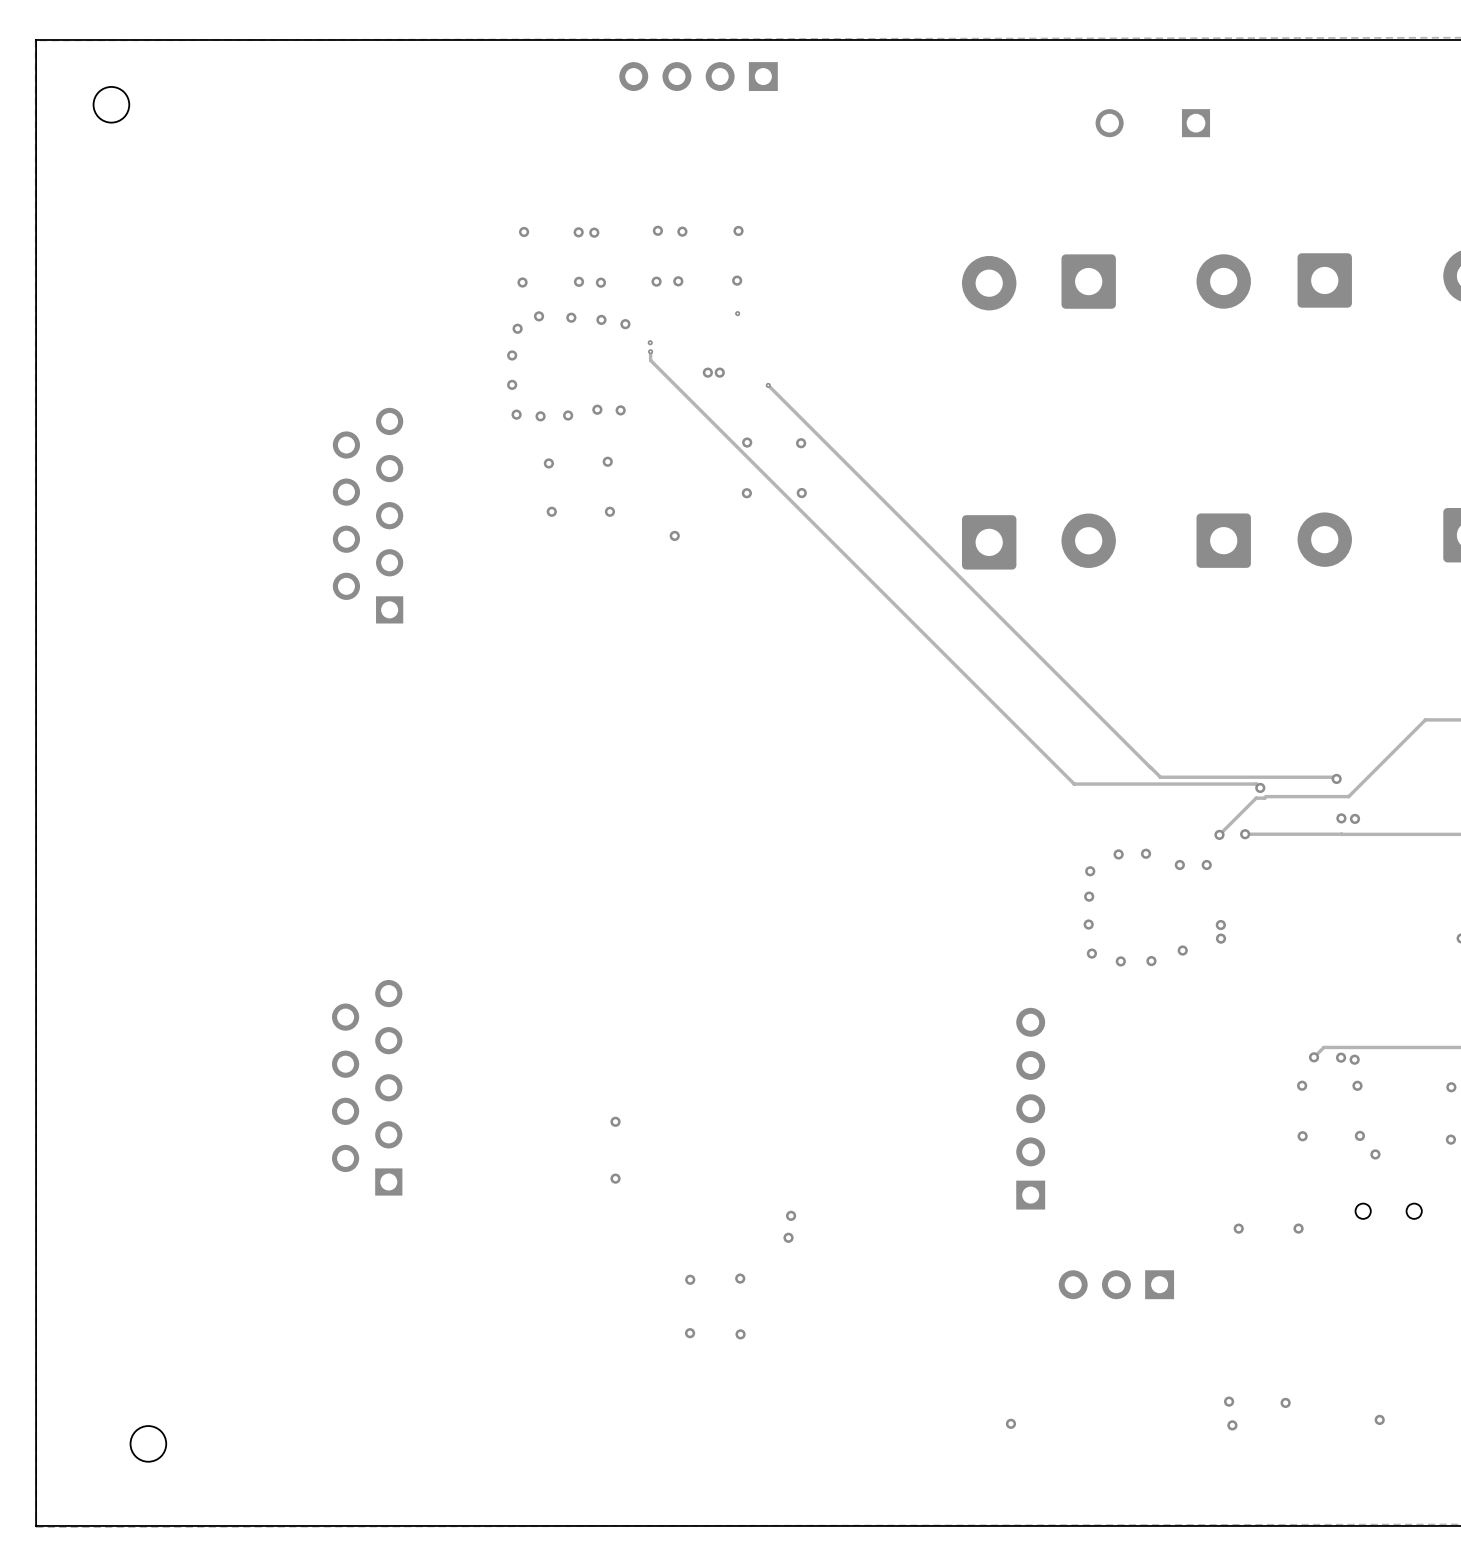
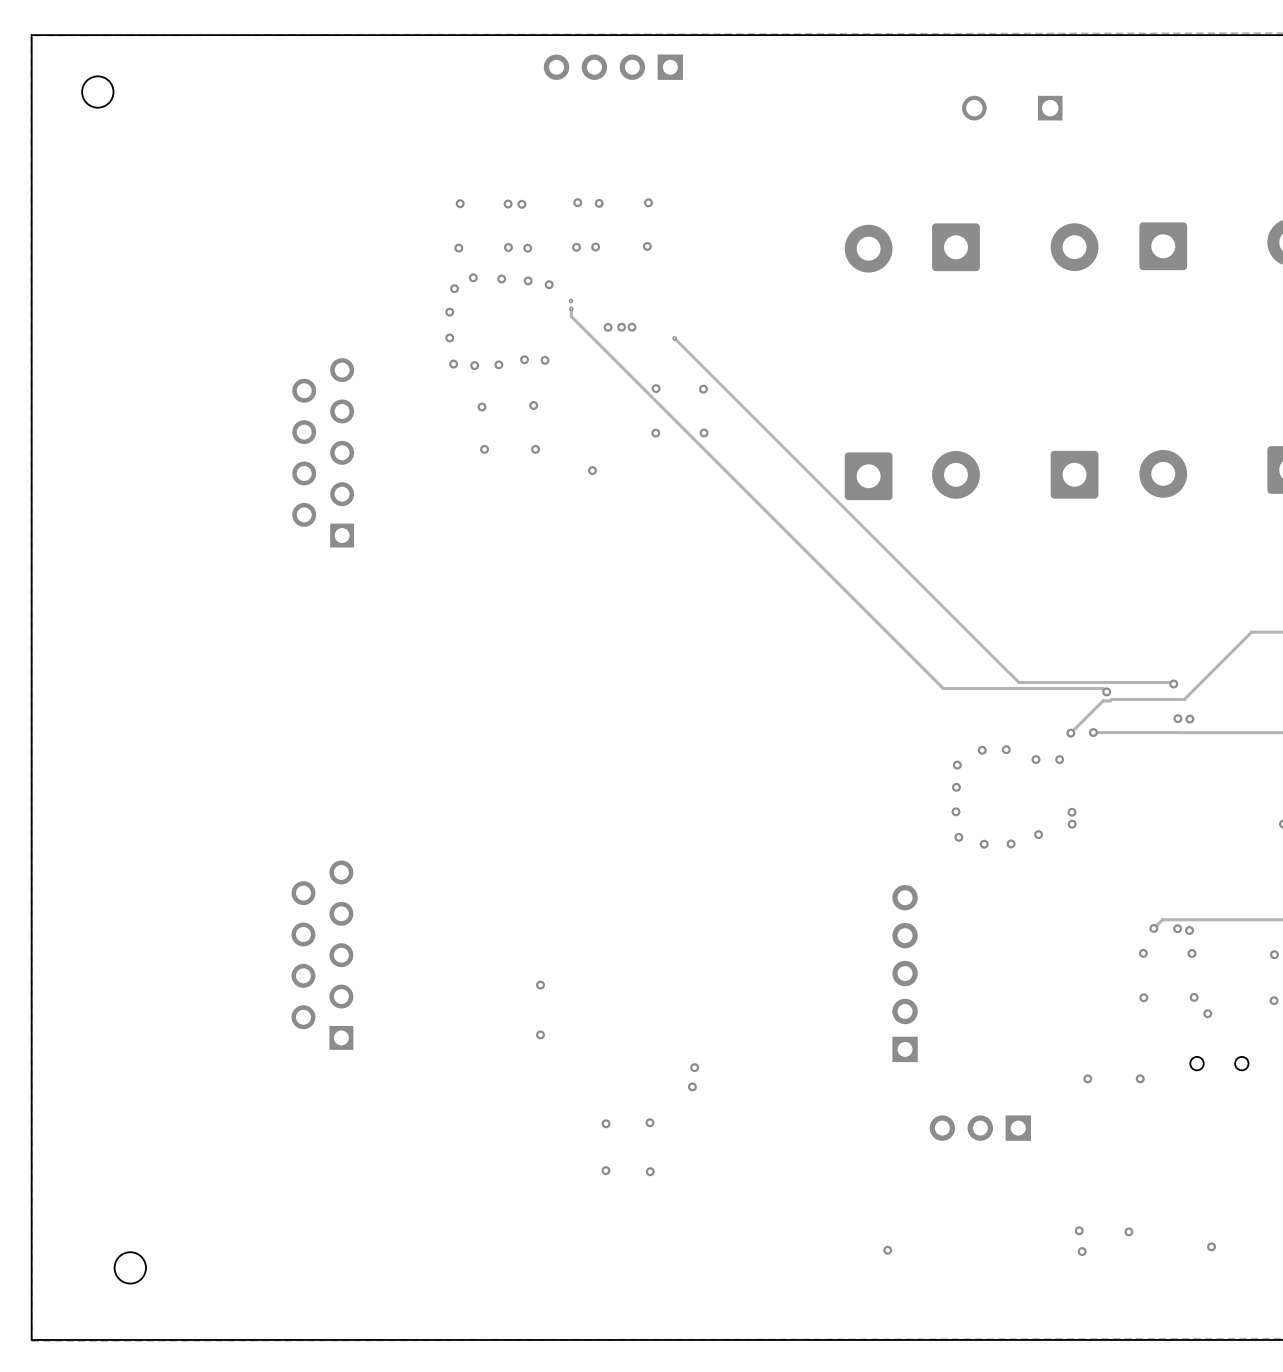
via: (737, 313) -> none
via: none -> (608, 327)

